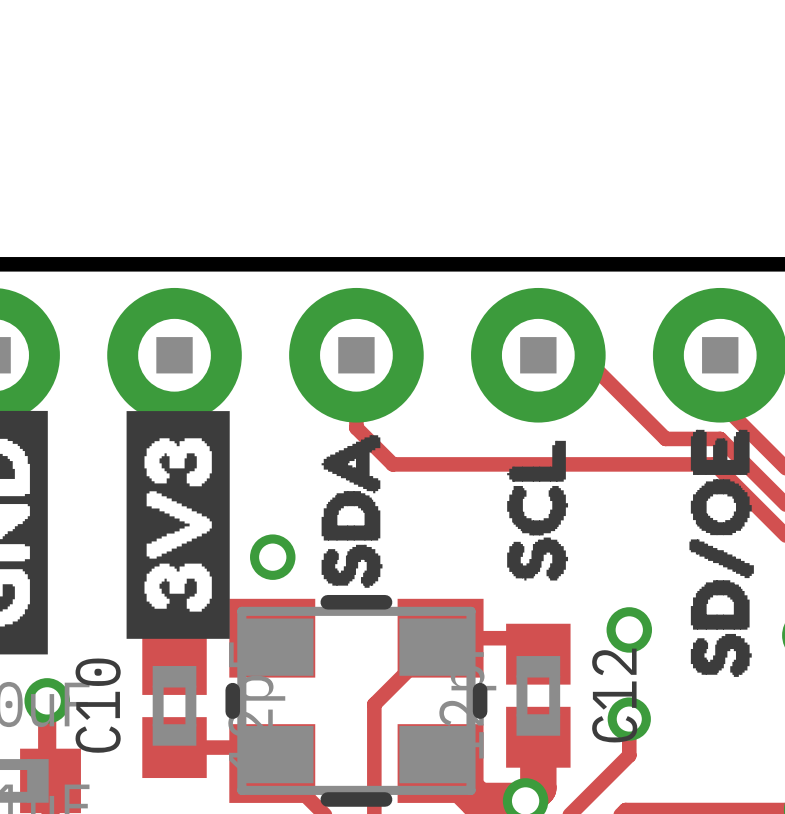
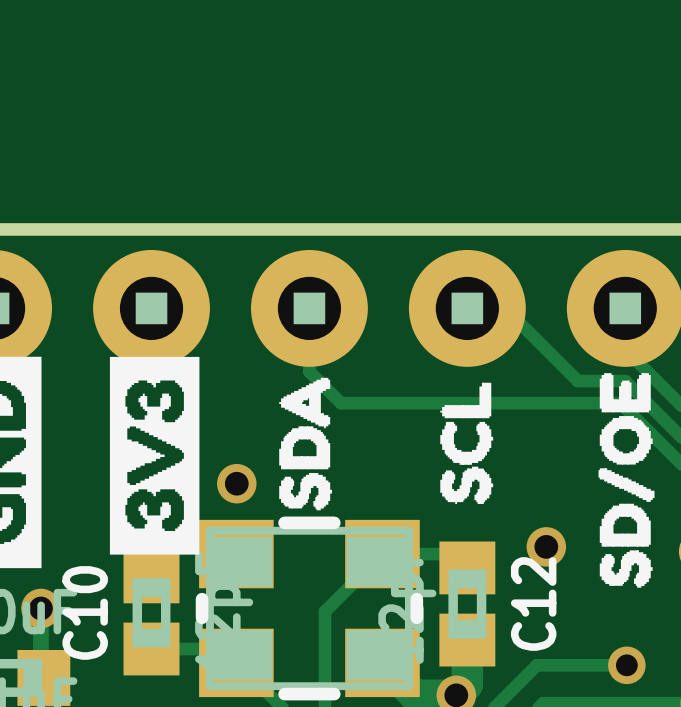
track: (629, 719) (629, 755) (618, 766) -> (626, 665) (536, 665)
via position: (629, 719) -> (626, 665)

